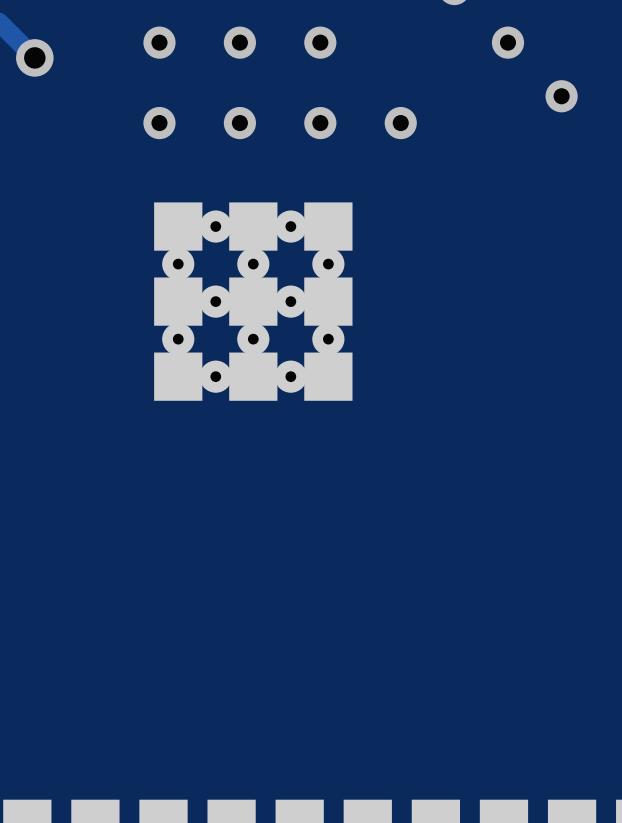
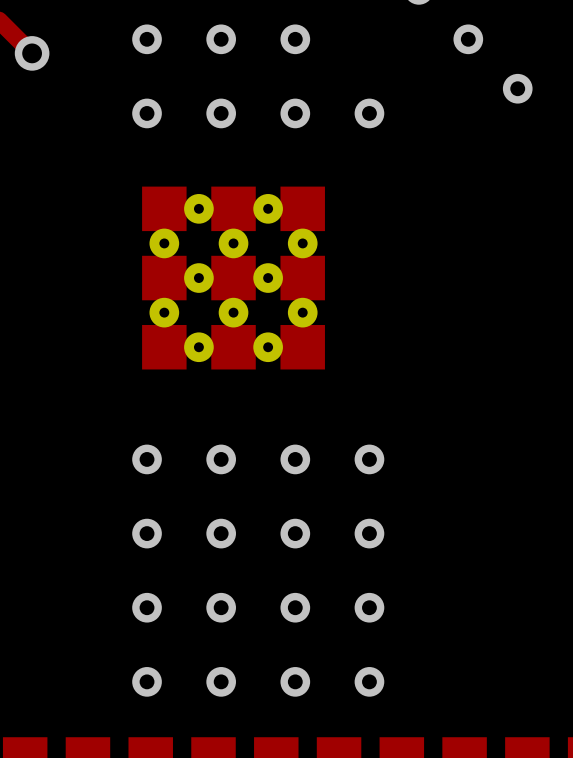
via: none -> (147, 459)
via: none -> (221, 459)
via: none -> (295, 459)
via: none -> (369, 459)
via: none -> (147, 533)
via: none -> (221, 533)
via: none -> (295, 533)
via: none -> (369, 533)
via: none -> (147, 607)
via: none -> (221, 607)
via: none -> (295, 607)
via: none -> (369, 607)
via: none -> (147, 681)
via: none -> (221, 681)
via: none -> (295, 681)
via: none -> (369, 681)

